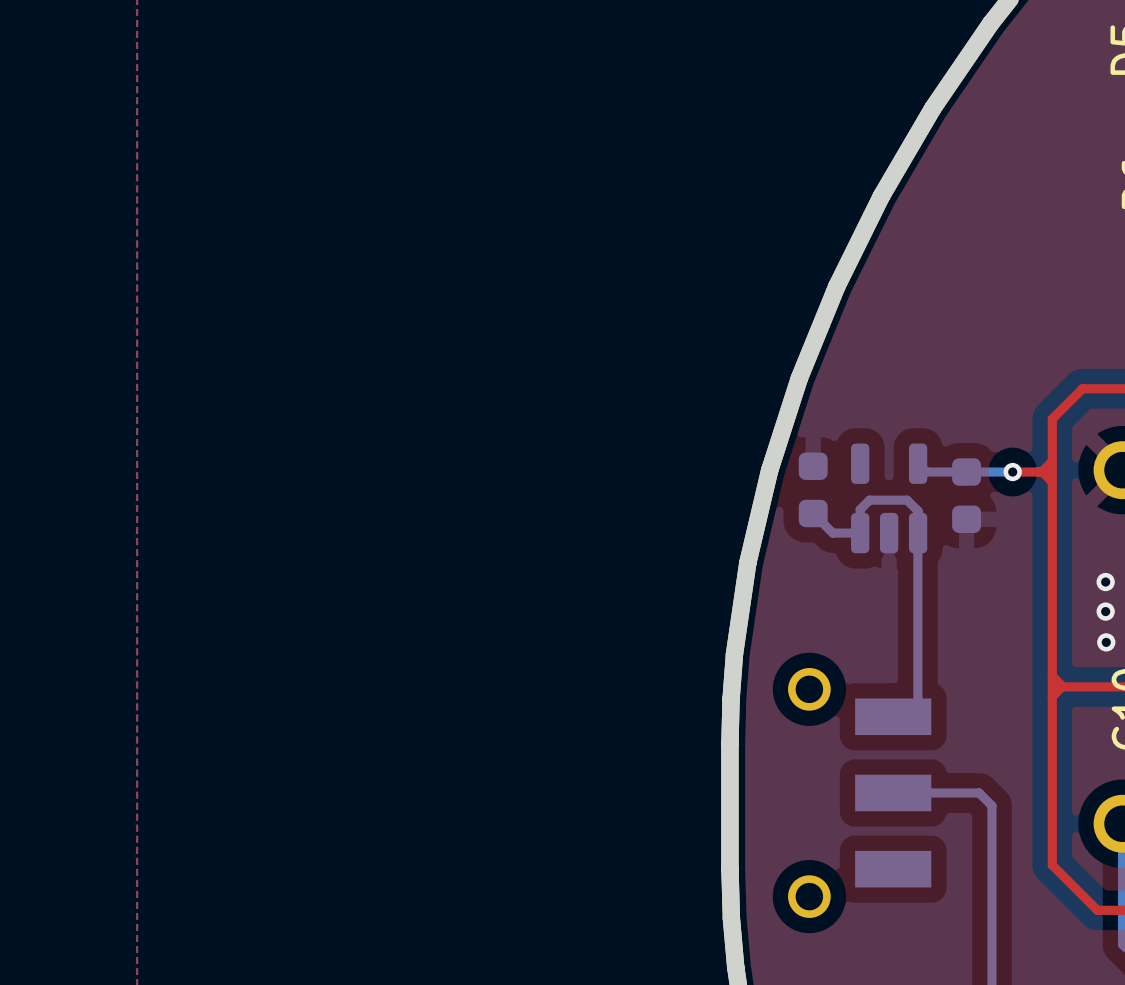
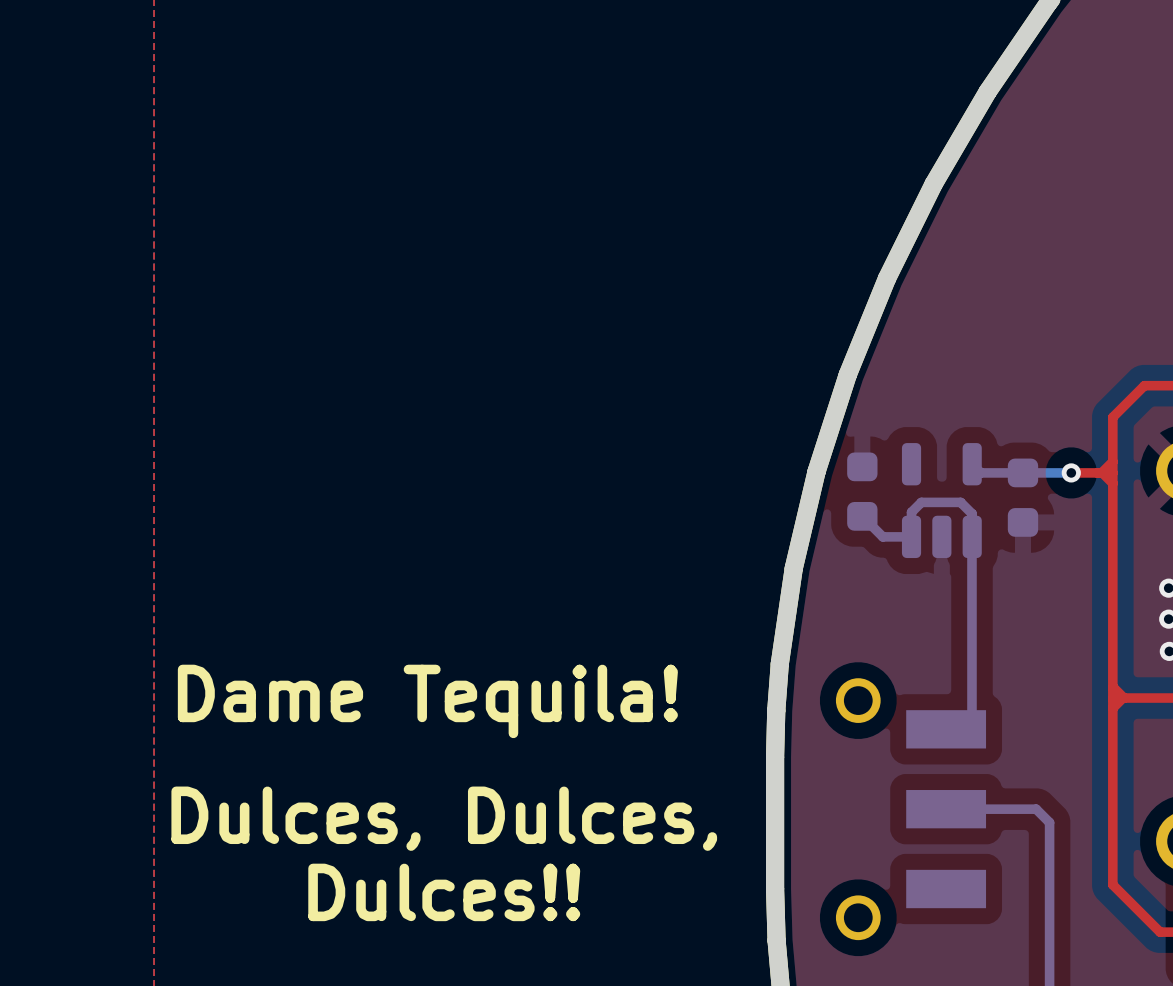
text: none -> Dame Tequila! (427, 701)
text: none -> Dulces, Dulces, (444, 818)
text: none -> Dulces!! (444, 892)

